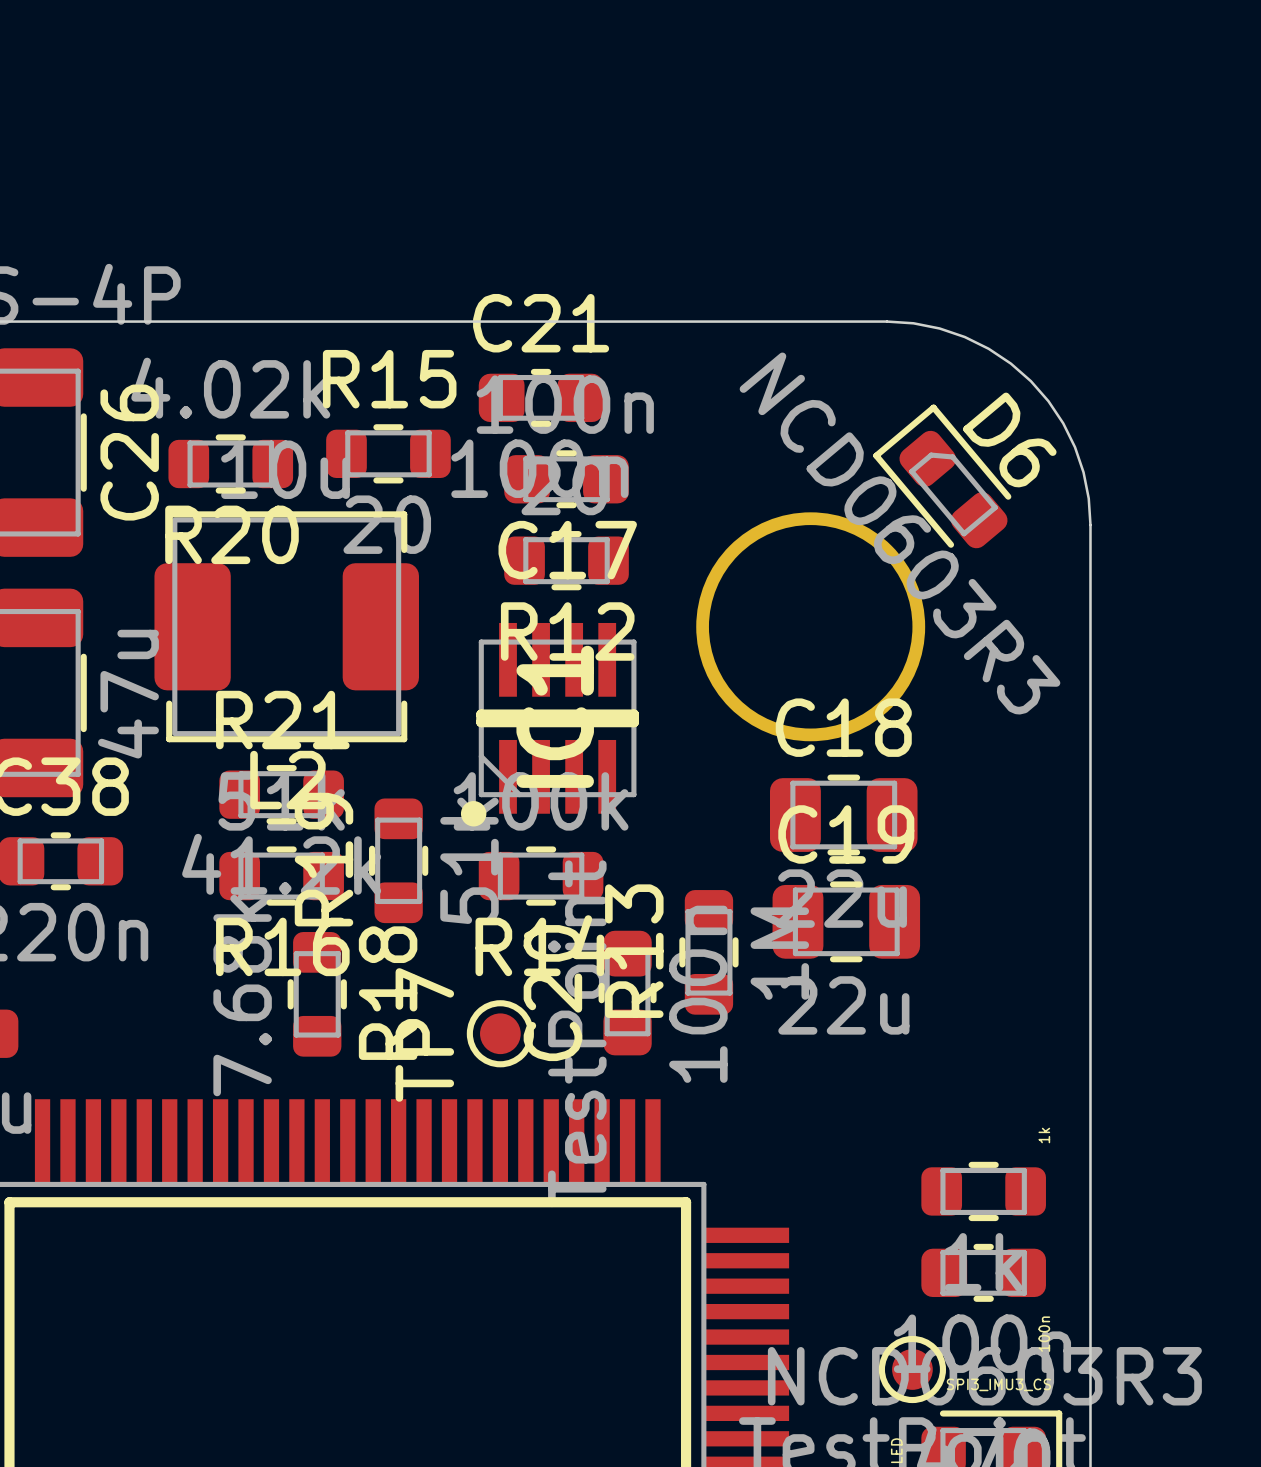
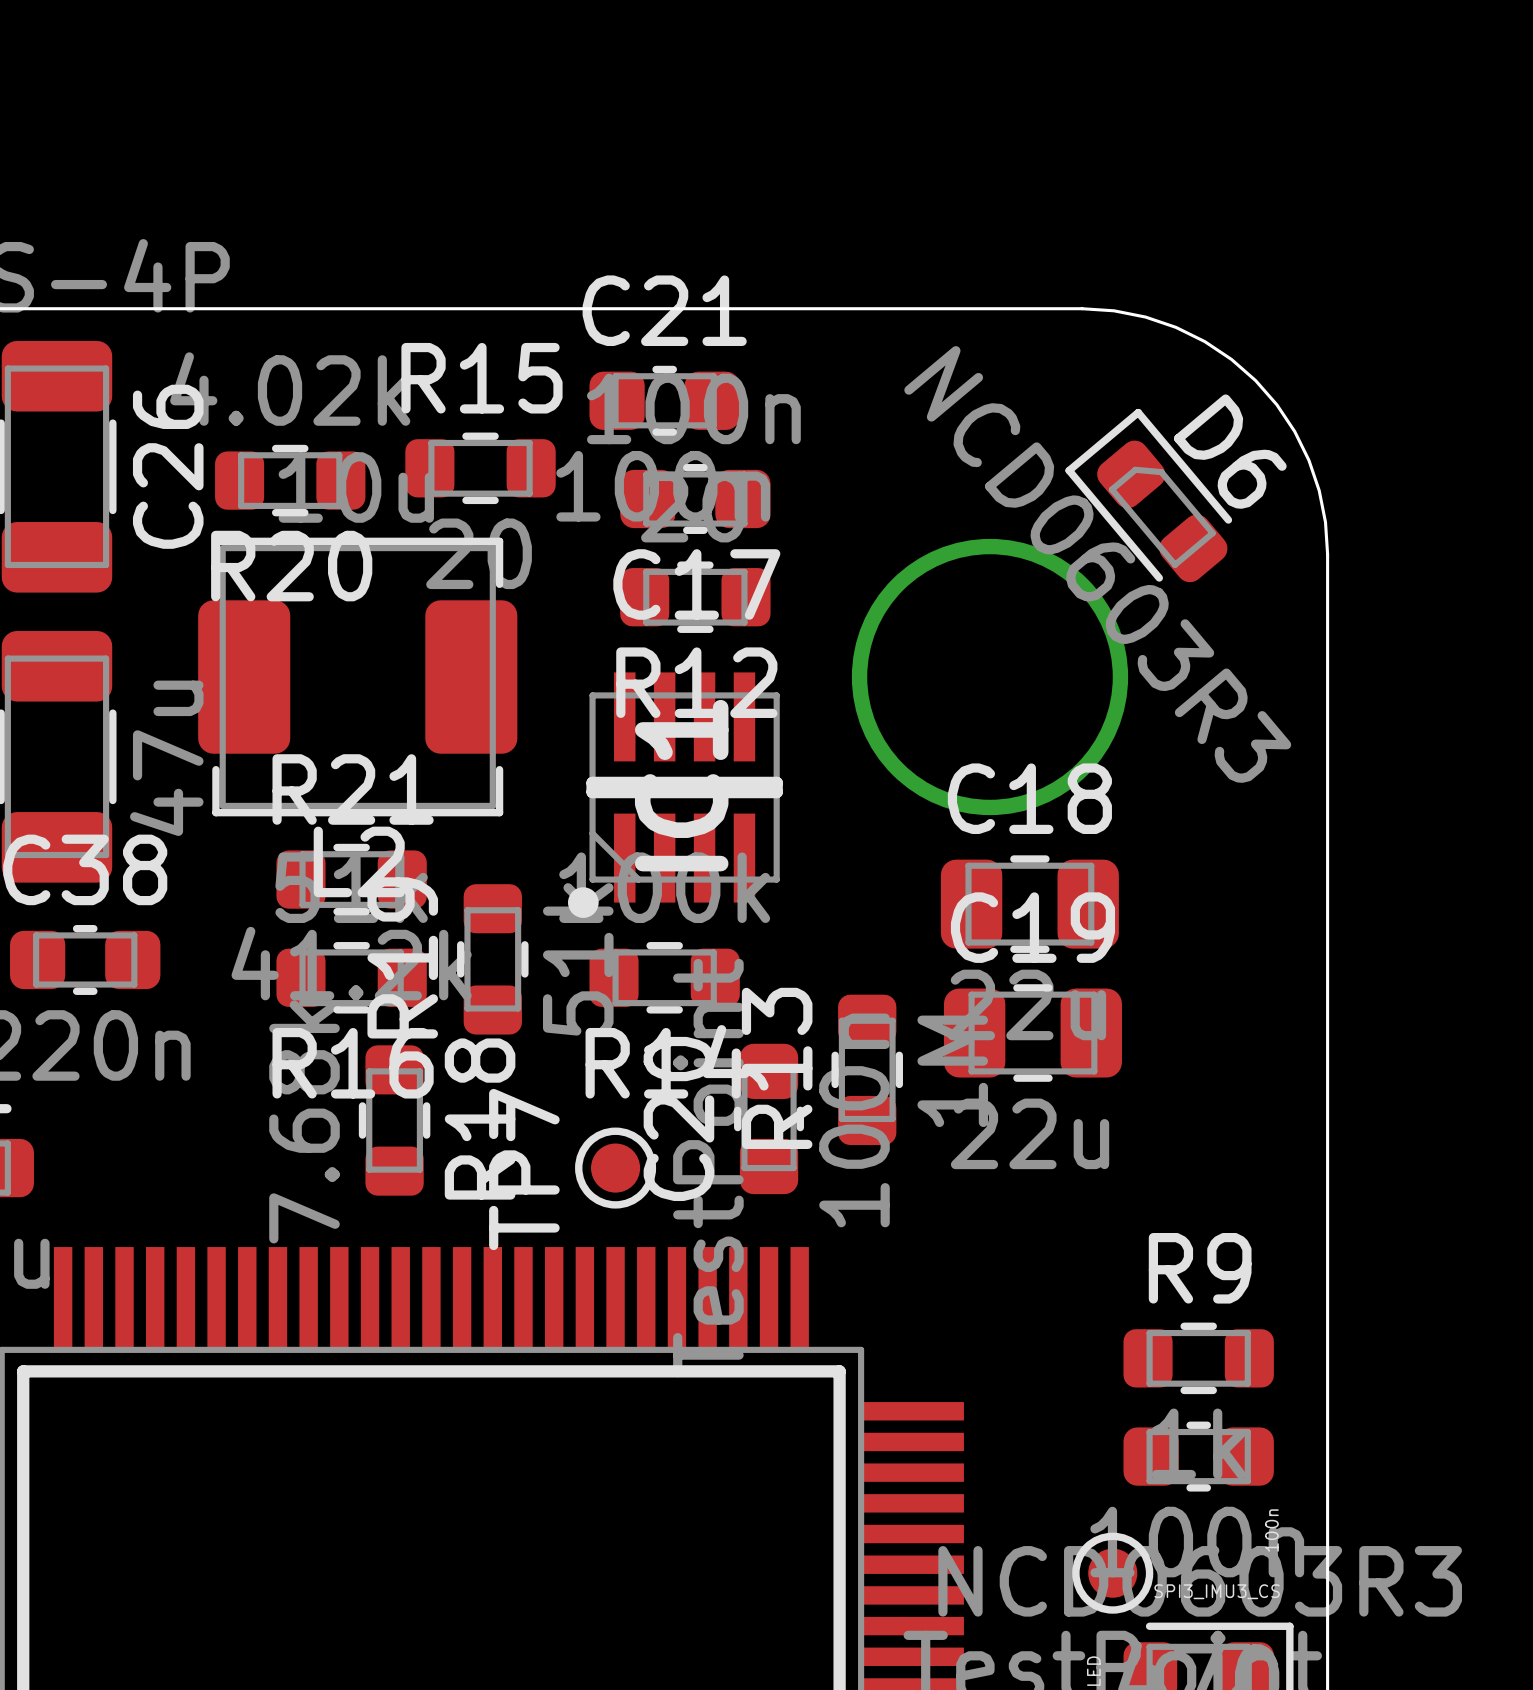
1k name: 1k (1044, 1135) -> R9 (1200, 1268)

